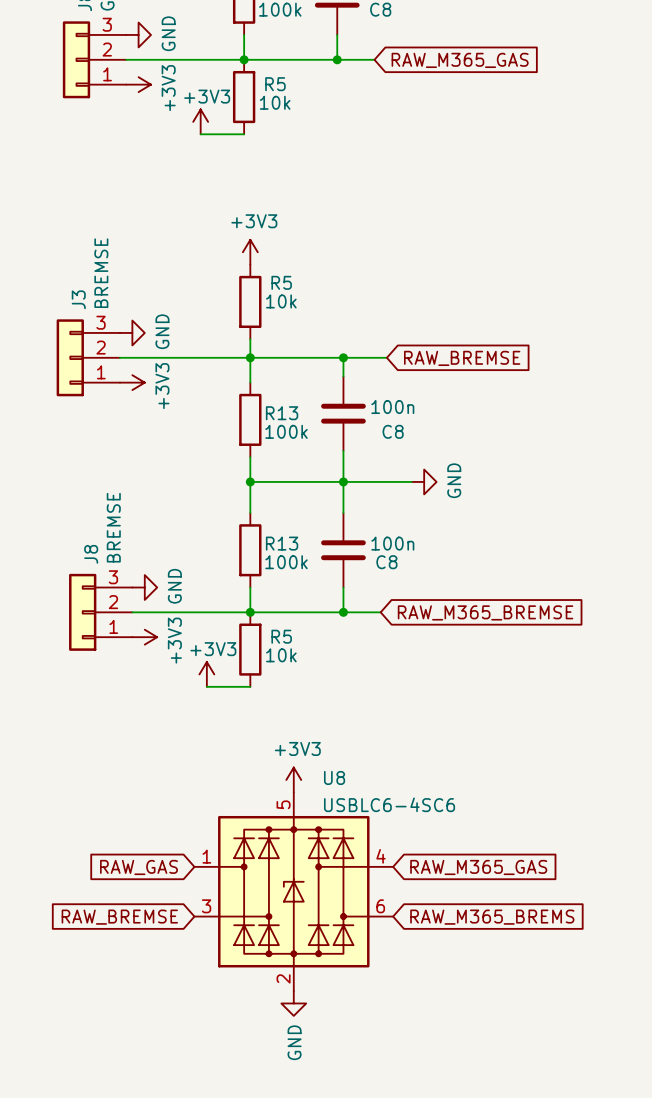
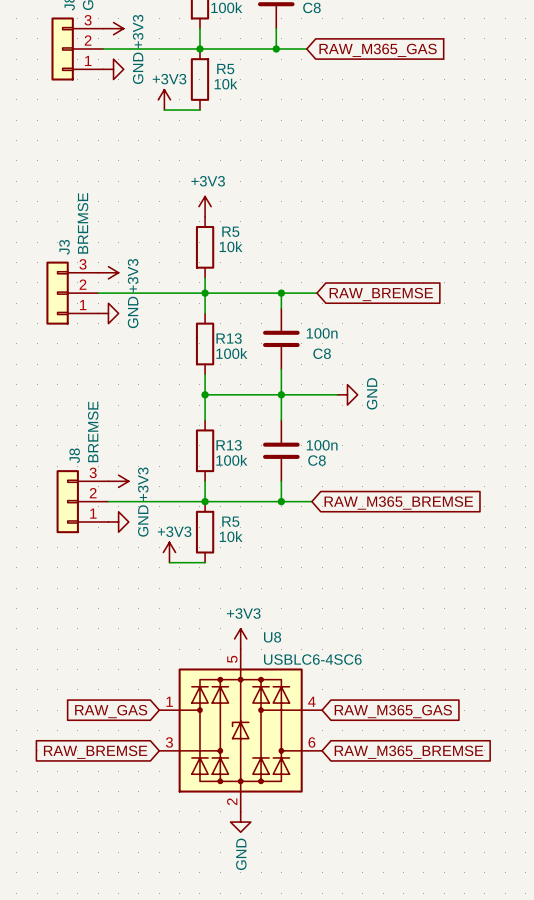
power symbol: GND (138, 34) -> +3V3 (113, 28)
power symbol: +3V3 (138, 84) -> GND (113, 69)
power symbol: GND (132, 332) -> +3V3 (108, 272)
power symbol: +3V3 (132, 382) -> GND (108, 313)
power symbol: GND (144, 587) -> +3V3 (118, 481)
power symbol: +3V3 (144, 637) -> GND (118, 521)
global label: RAW_M365_BREMS (492, 917) -> RAW_M365_BREMSE (408, 752)

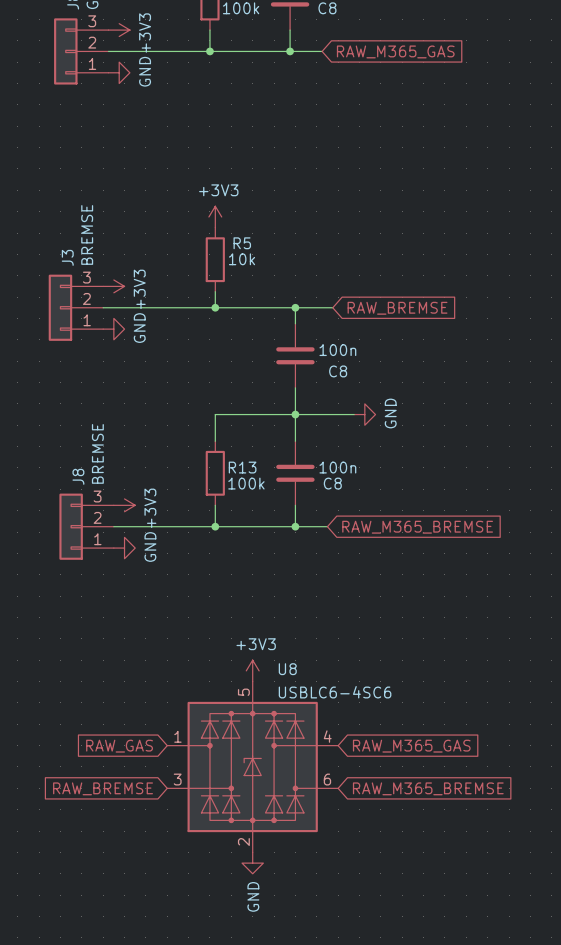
R5: 10k (199, 79) -> none
power symbol: +3V3 (164, 99) -> none
wire: (164, 110) (199, 110) -> none
wire: (205, 293) (205, 313) -> none
R13: 100k (205, 343) -> none
wire: (205, 374) (205, 394) -> none
junction: (205, 394) -> none
R5: 10k (205, 532) -> none
power symbol: +3V3 (169, 552) -> none
wire: (169, 562) (205, 562) -> none

